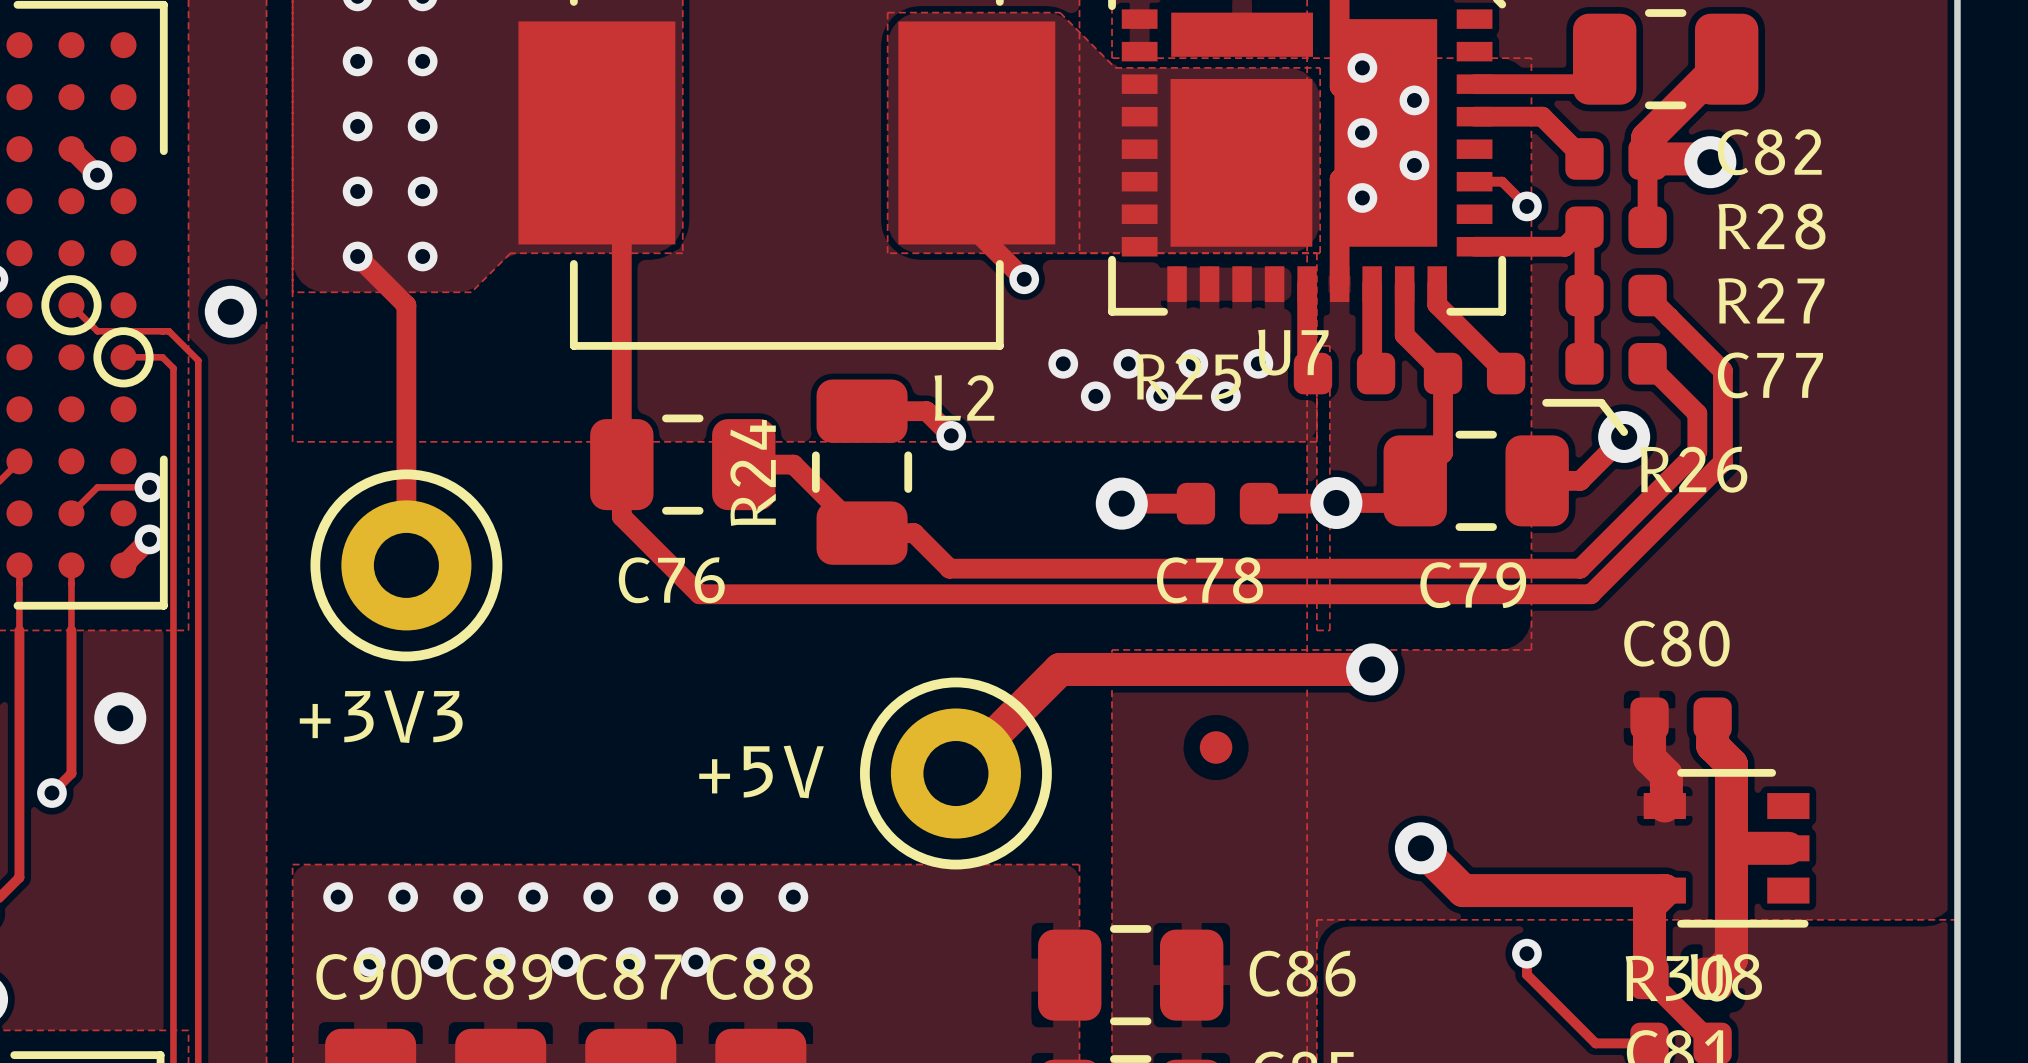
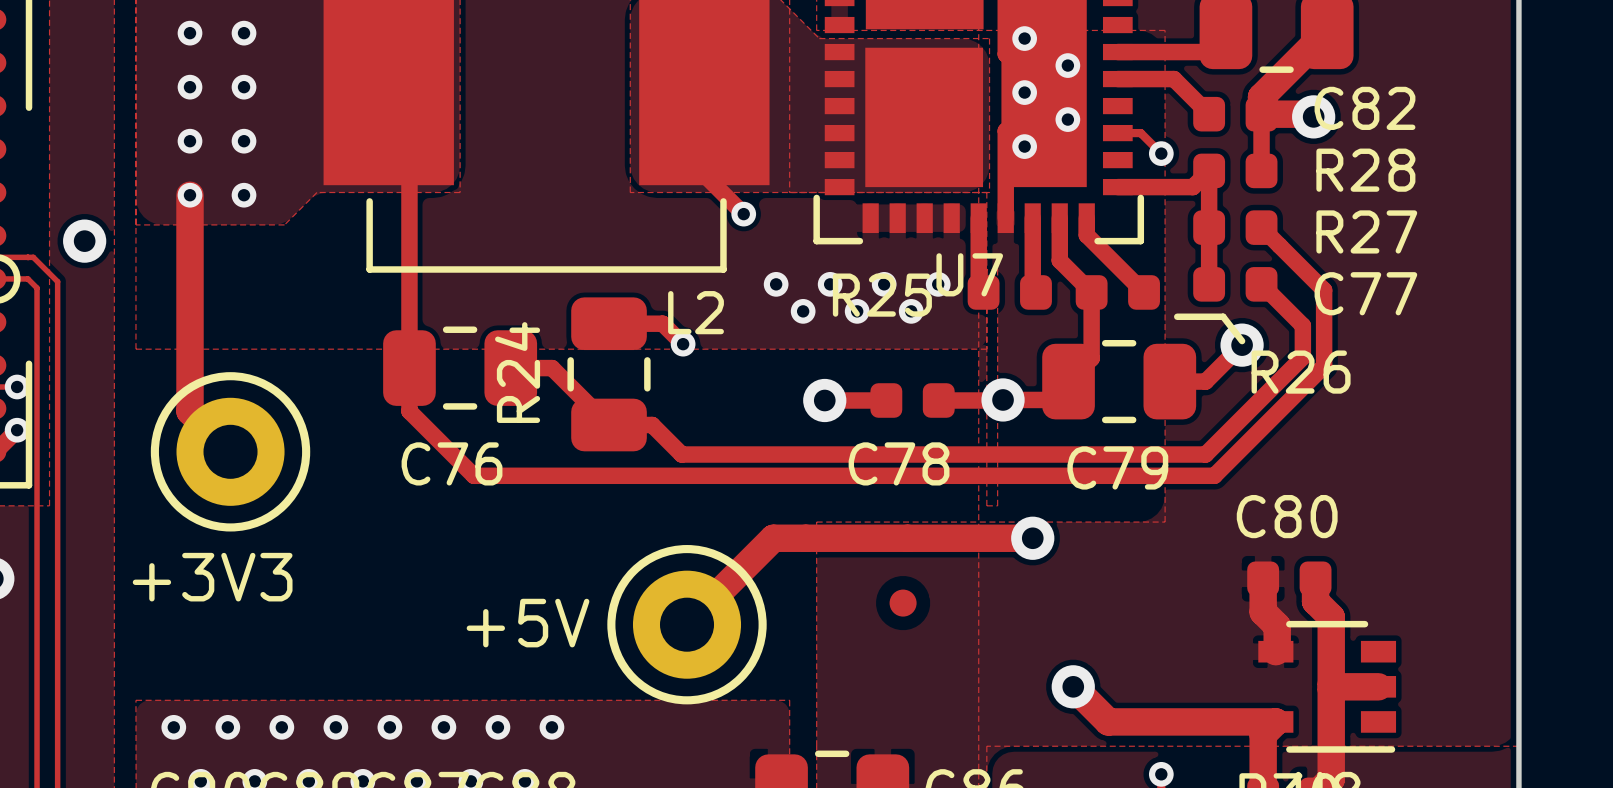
track: (357, 256) (406, 305) (406, 565) -> (190, 195) (190, 411) (230, 451)

